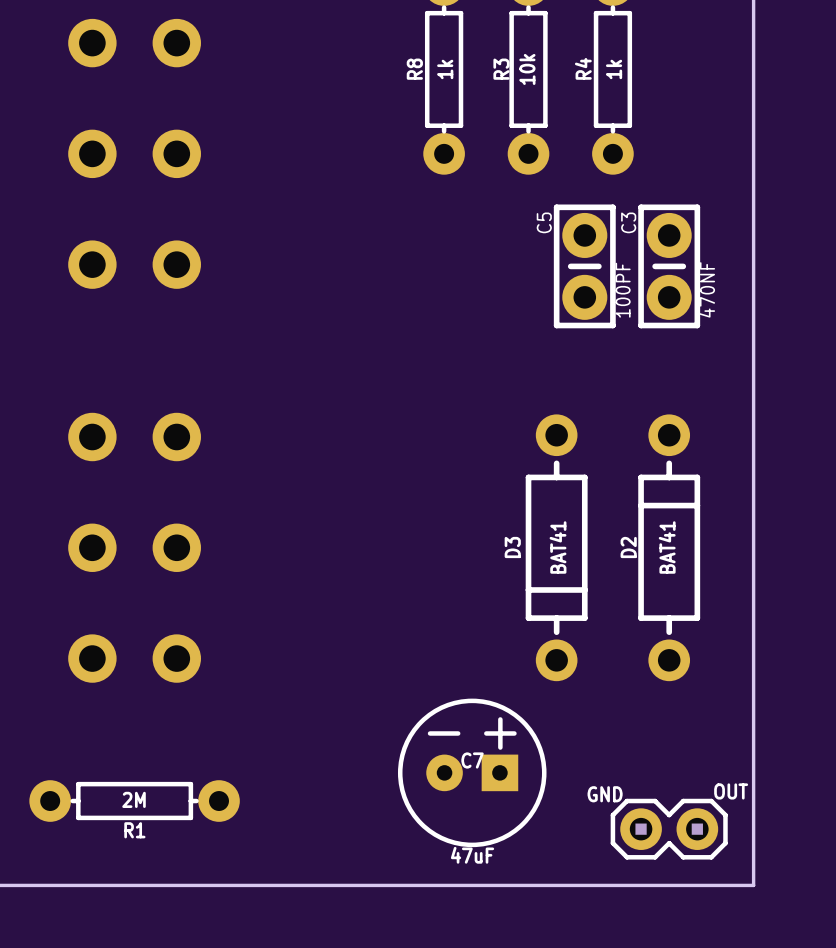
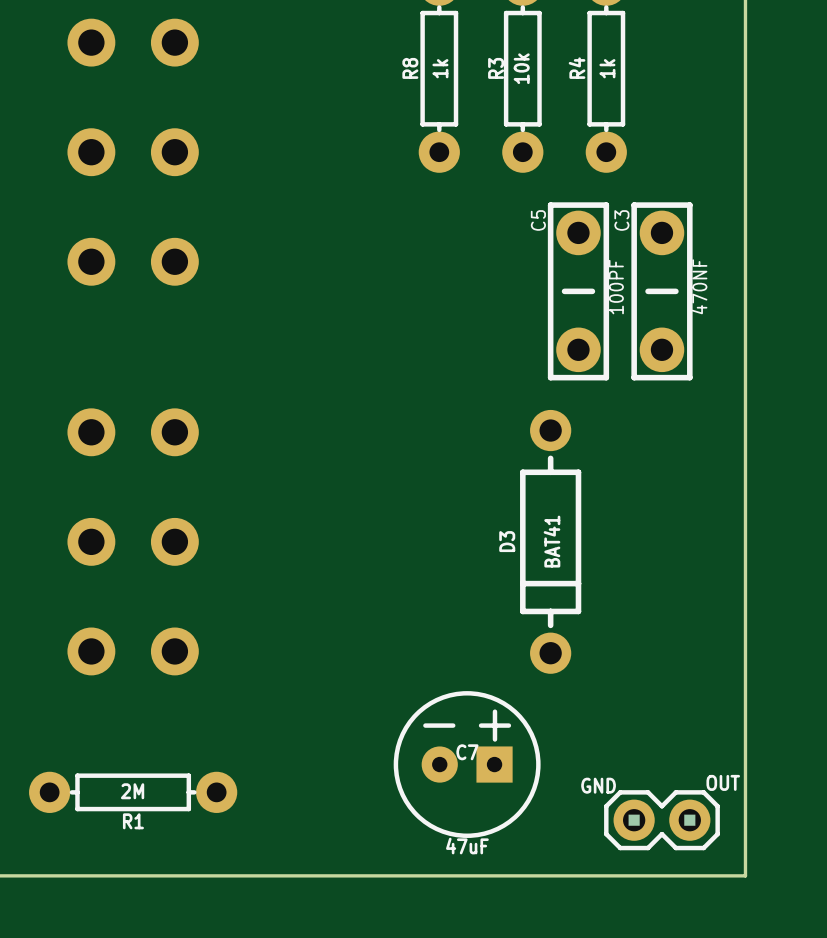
C5 footprint: [553, 204, 616, 329] -> [547, 202, 610, 381]
C3 footprint: [638, 204, 701, 329] -> [631, 202, 693, 381]
D2: BAT41 (669, 547) -> none

